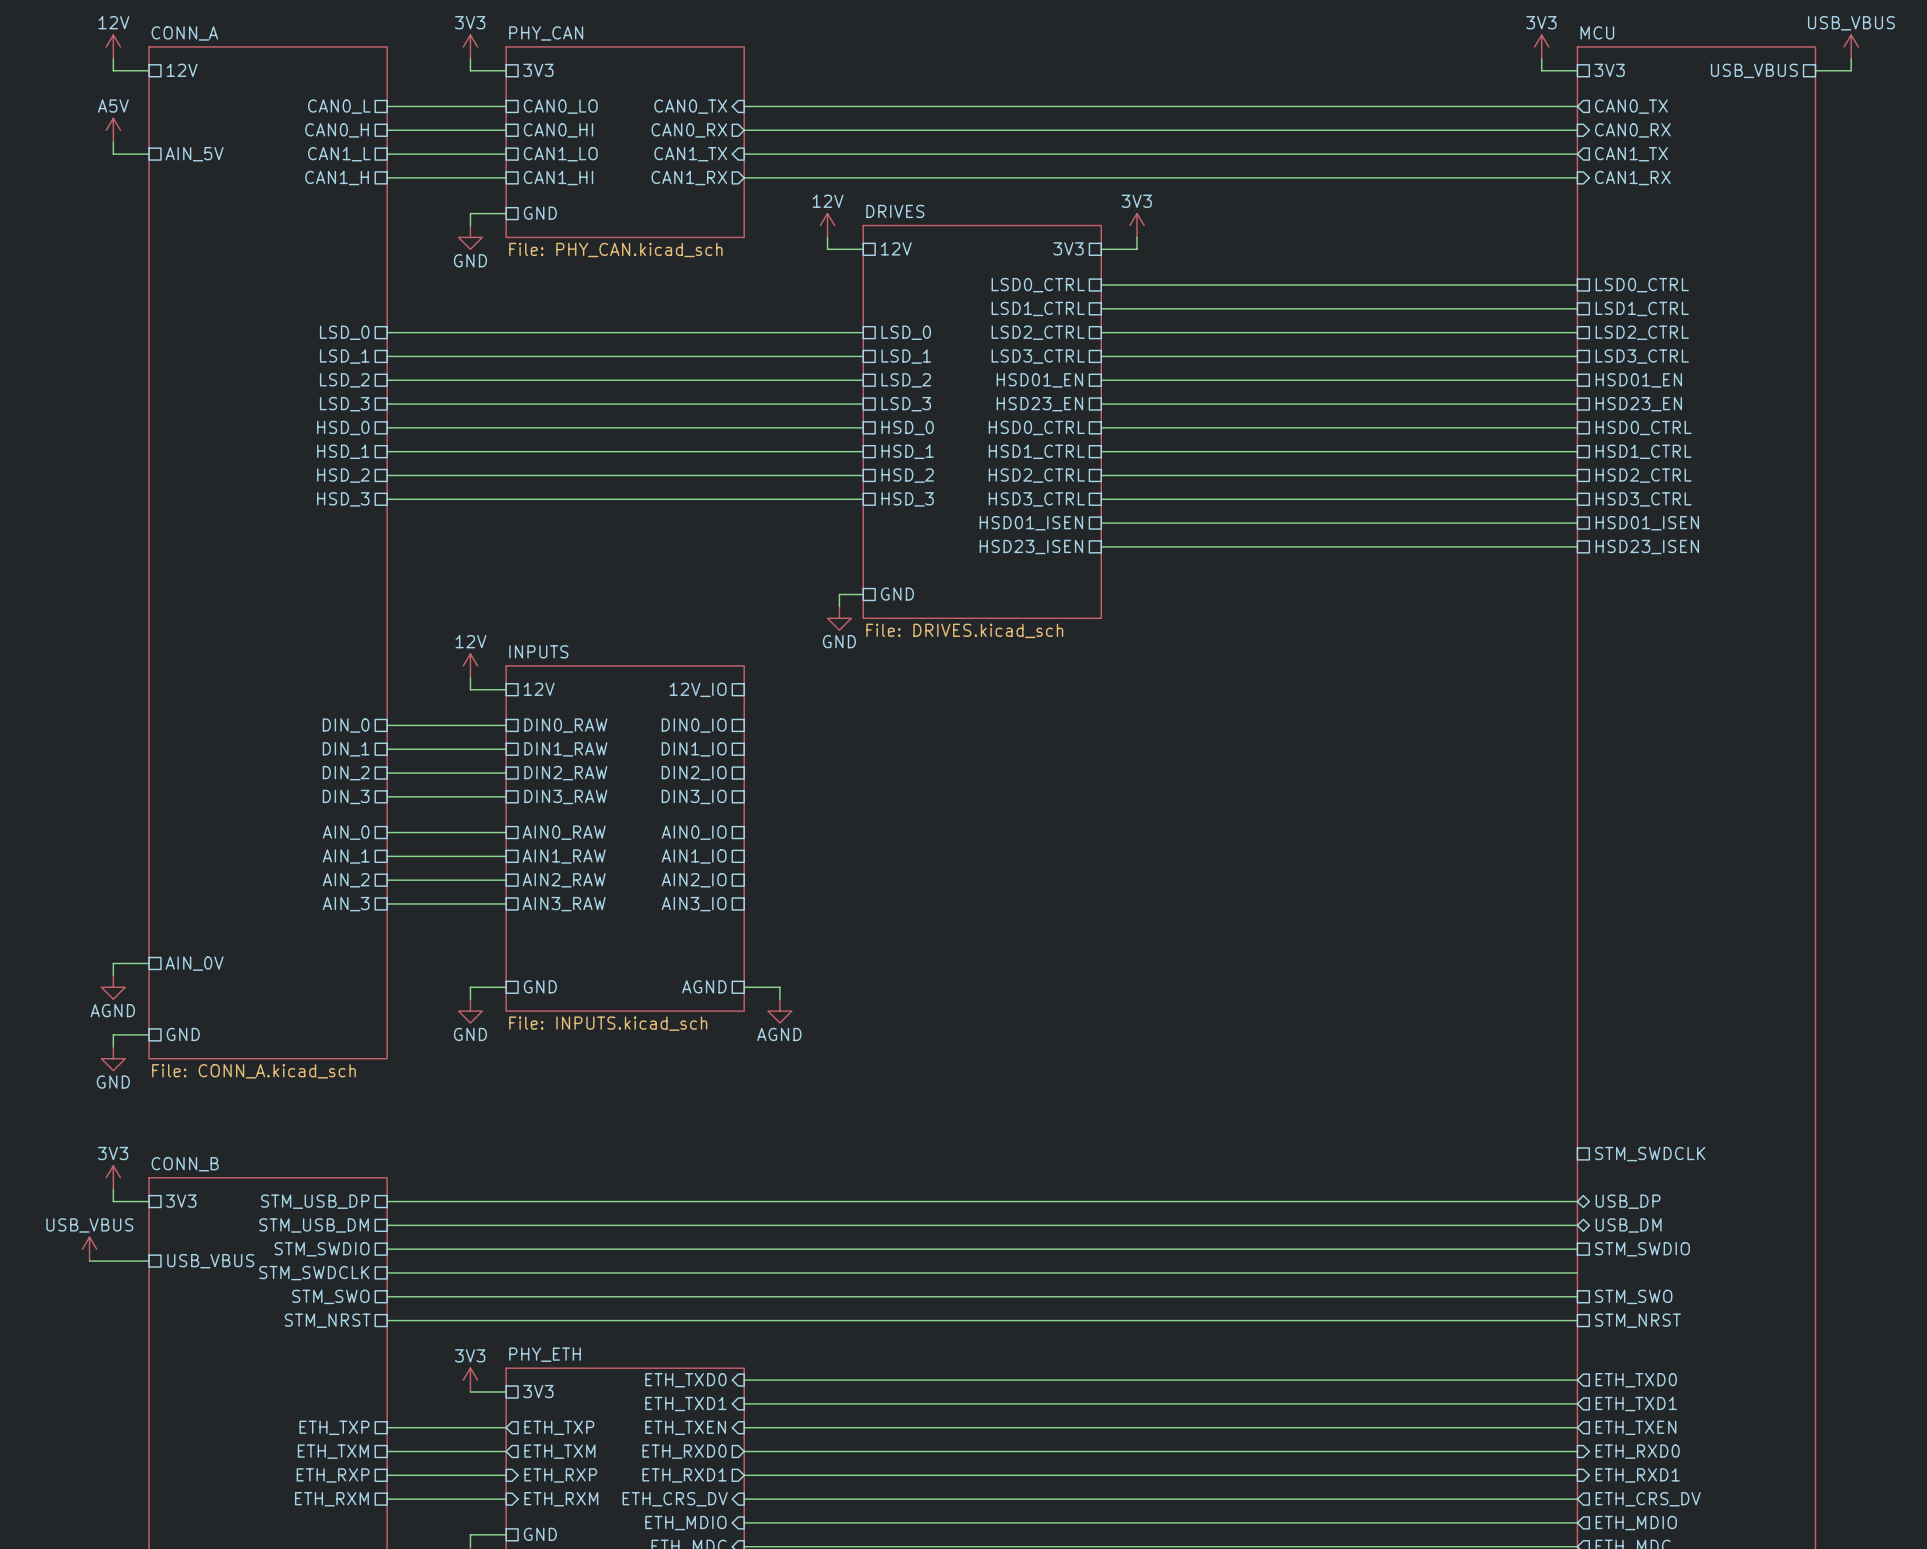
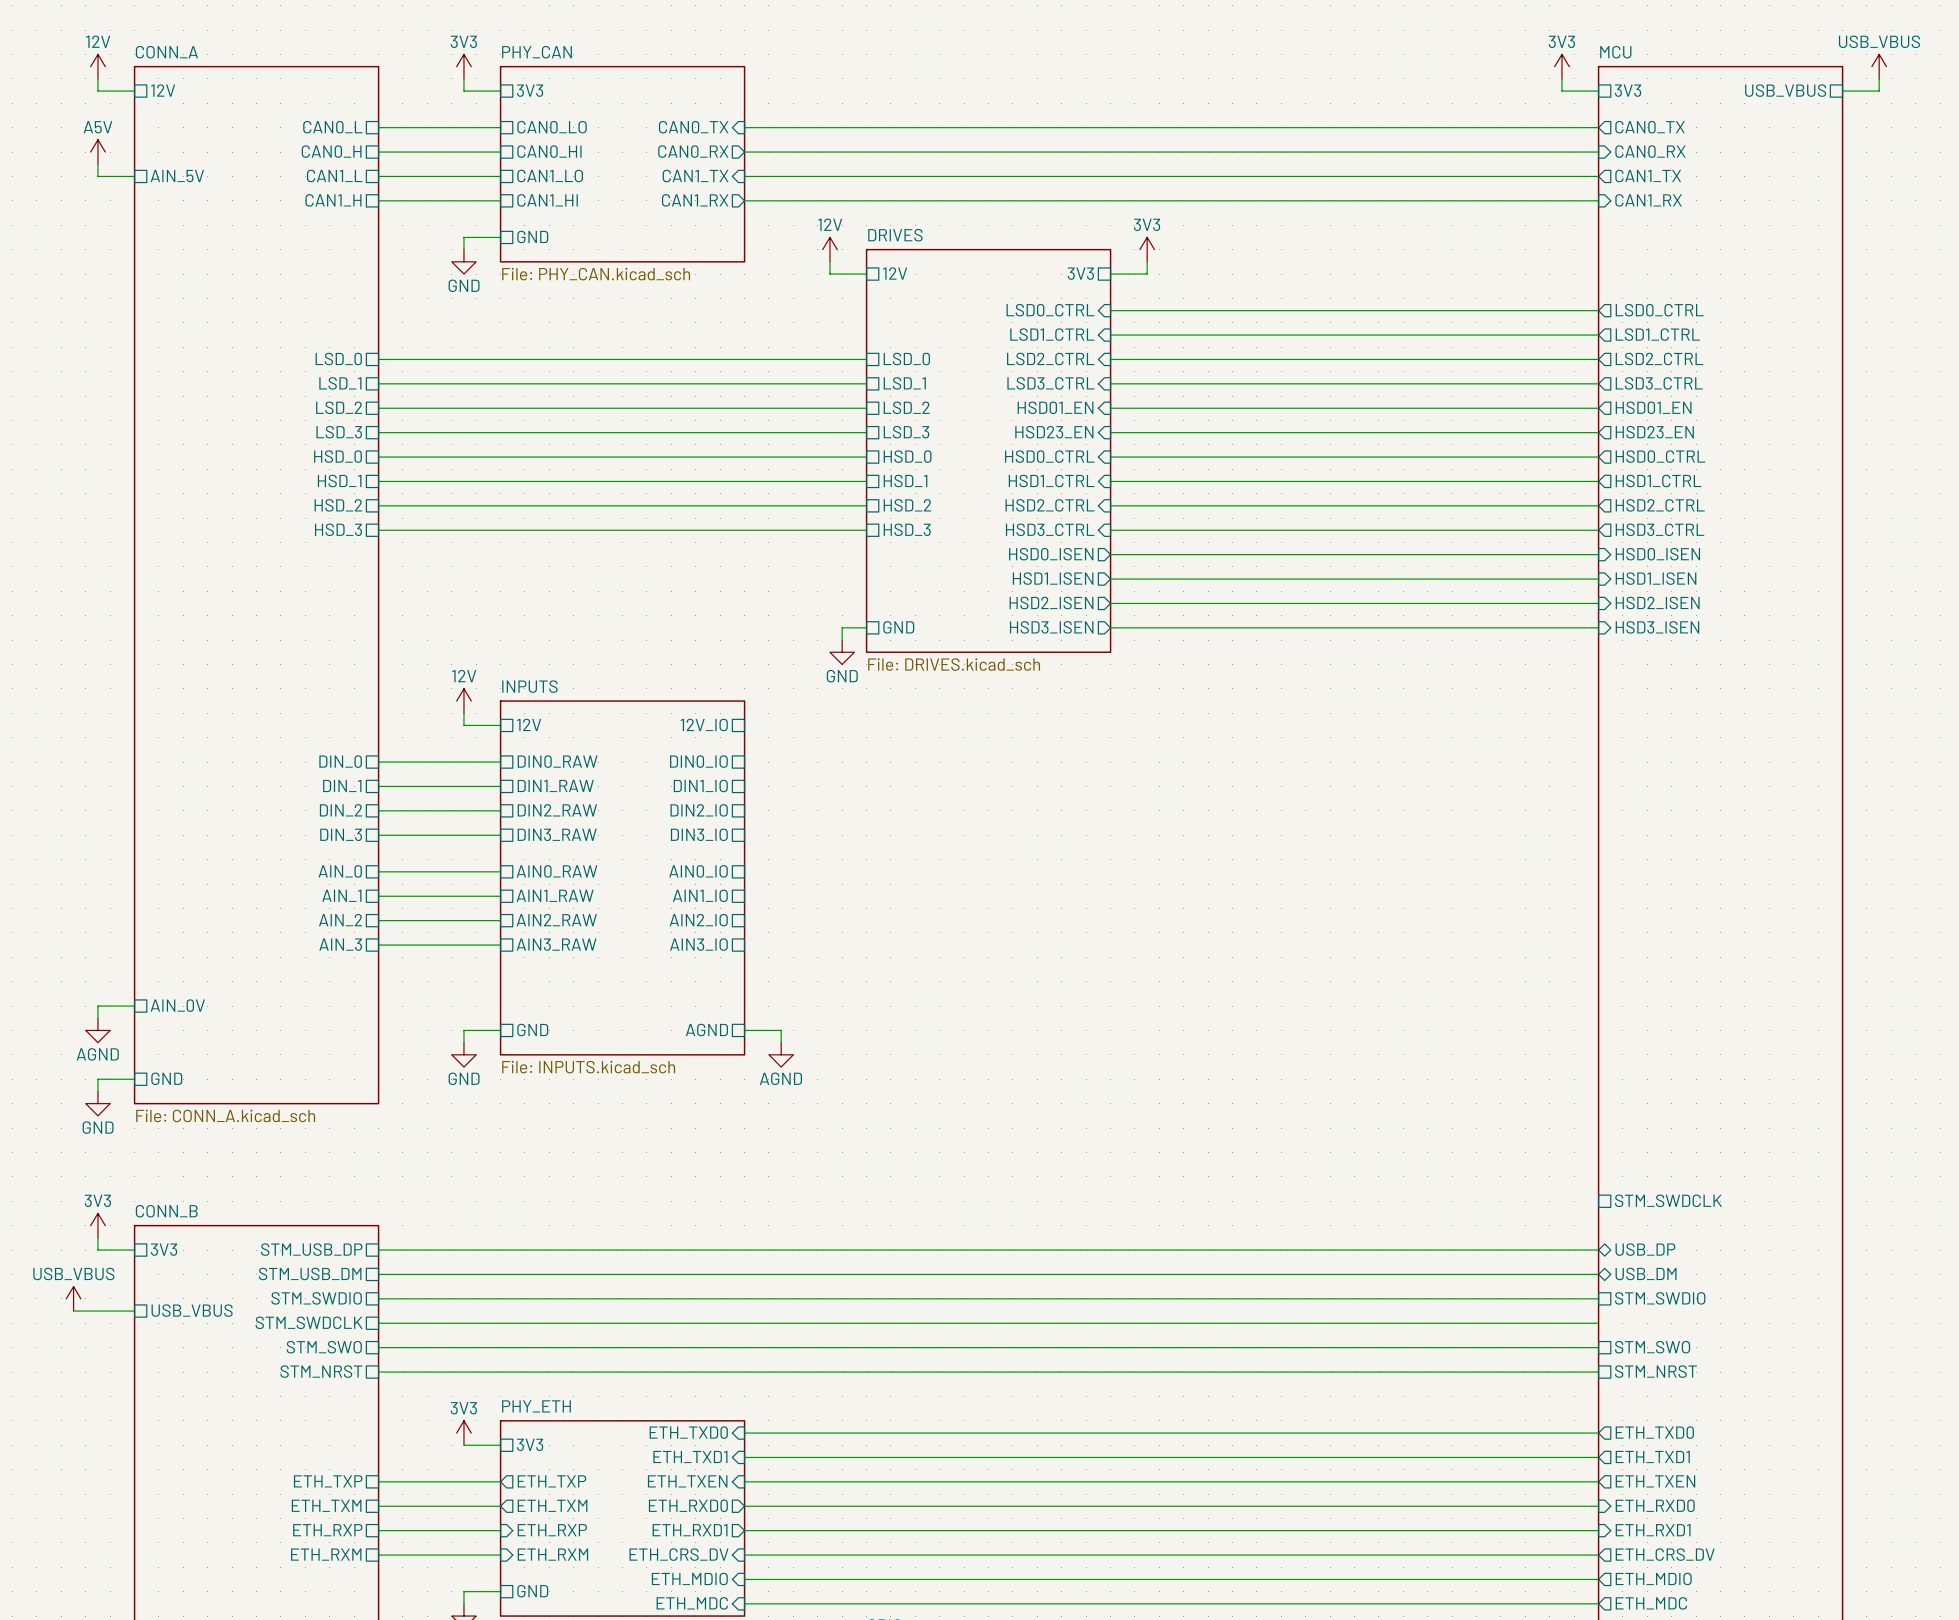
sheet pin shape: passive (1038, 285) -> input (1050, 310)
sheet pin shape: passive (1642, 285) -> output (1659, 310)
sheet pin shape: passive (1038, 308) -> input (1052, 334)
sheet pin shape: passive (1642, 308) -> output (1657, 334)
sheet pin shape: passive (1038, 332) -> input (1050, 358)
sheet pin shape: passive (1642, 332) -> output (1659, 358)
sheet pin shape: passive (1038, 356) -> input (1050, 383)
sheet pin shape: passive (1642, 356) -> output (1659, 383)
sheet pin shape: passive (1039, 380) -> input (1055, 407)
sheet pin shape: passive (1638, 380) -> output (1653, 407)
sheet pin shape: passive (1039, 404) -> input (1054, 432)
sheet pin shape: passive (1638, 404) -> output (1654, 432)
sheet pin shape: passive (1036, 427) -> input (1049, 456)
sheet pin shape: passive (1643, 427) -> output (1660, 456)
sheet pin shape: passive (1036, 451) -> input (1051, 480)
sheet pin shape: passive (1643, 451) -> output (1658, 480)
sheet pin shape: passive (1036, 475) -> input (1049, 505)
sheet pin shape: passive (1643, 475) -> output (1660, 505)
sheet pin shape: passive (1036, 499) -> input (1050, 529)
sheet pin shape: passive (1643, 499) -> output (1659, 529)
sheet pin shape: passive (1031, 523) -> output (1051, 554)
sheet pin: HSD01_ISEN (1031, 523) -> HSD0_ISEN (1051, 554)
sheet pin shape: passive (1647, 523) -> input (1657, 554)
sheet pin: HSD01_ISEN (1647, 523) -> HSD0_ISEN (1657, 554)
sheet pin shape: passive (1031, 547) -> output (1053, 578)
sheet pin: HSD23_ISEN (1031, 547) -> HSD1_ISEN (1053, 578)
sheet pin shape: passive (1647, 547) -> input (1656, 578)
sheet pin: HSD23_ISEN (1647, 547) -> HSD1_ISEN (1656, 578)
sheet pin: none -> HSD2_ISEN (1051, 602)
wire: none -> (1110, 603) (1598, 603)
sheet pin: none -> HSD2_ISEN (1657, 602)
sheet pin: none -> HSD3_ISEN (1051, 627)
wire: none -> (1110, 627) (1598, 627)
sheet pin: none -> HSD3_ISEN (1657, 627)

